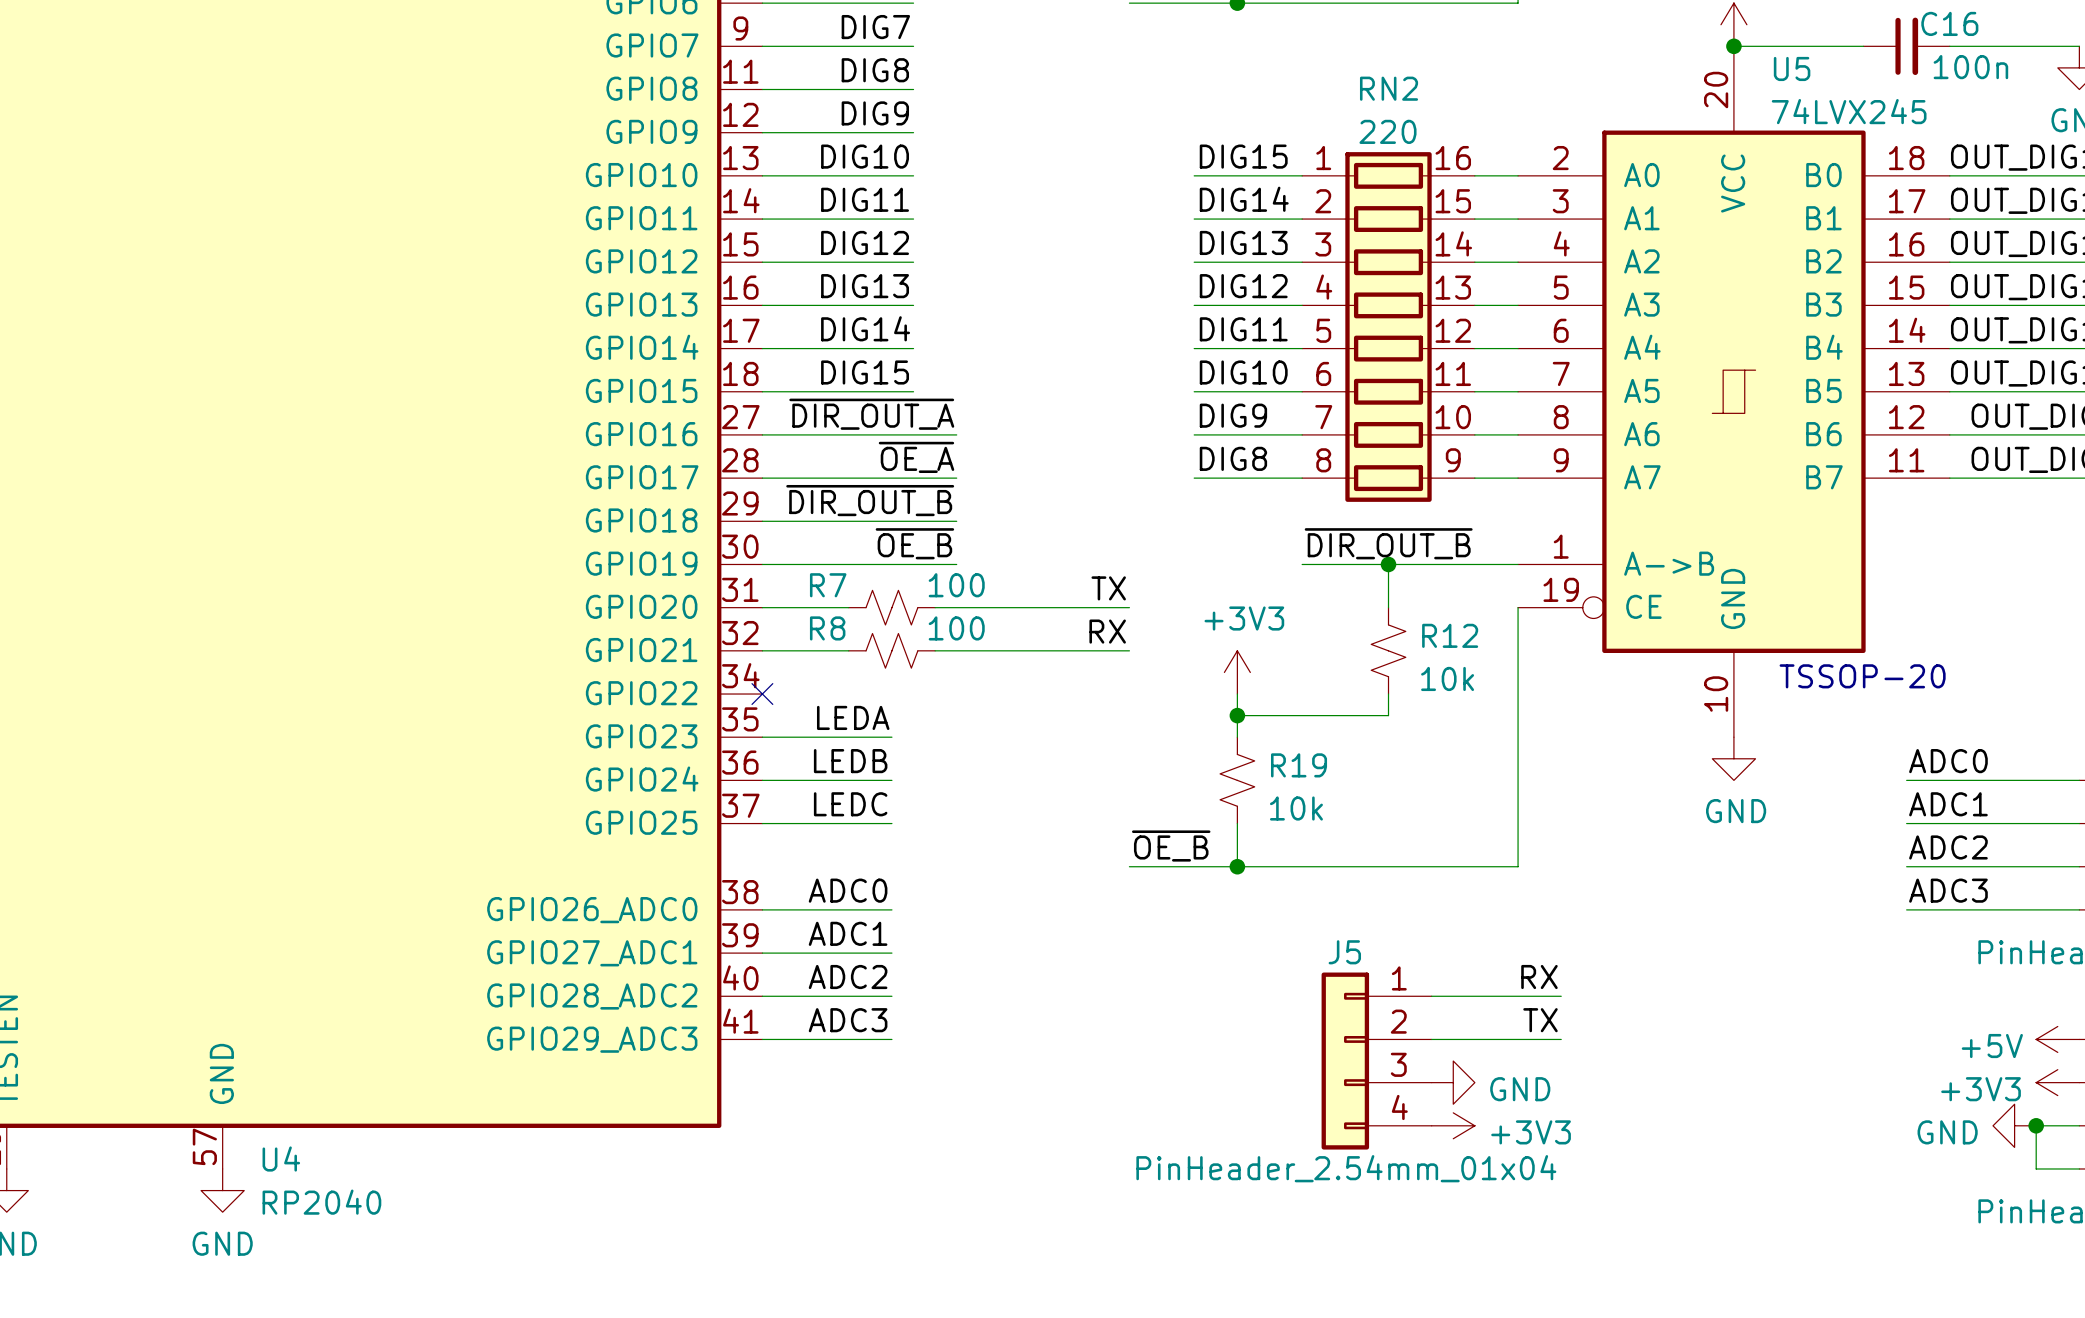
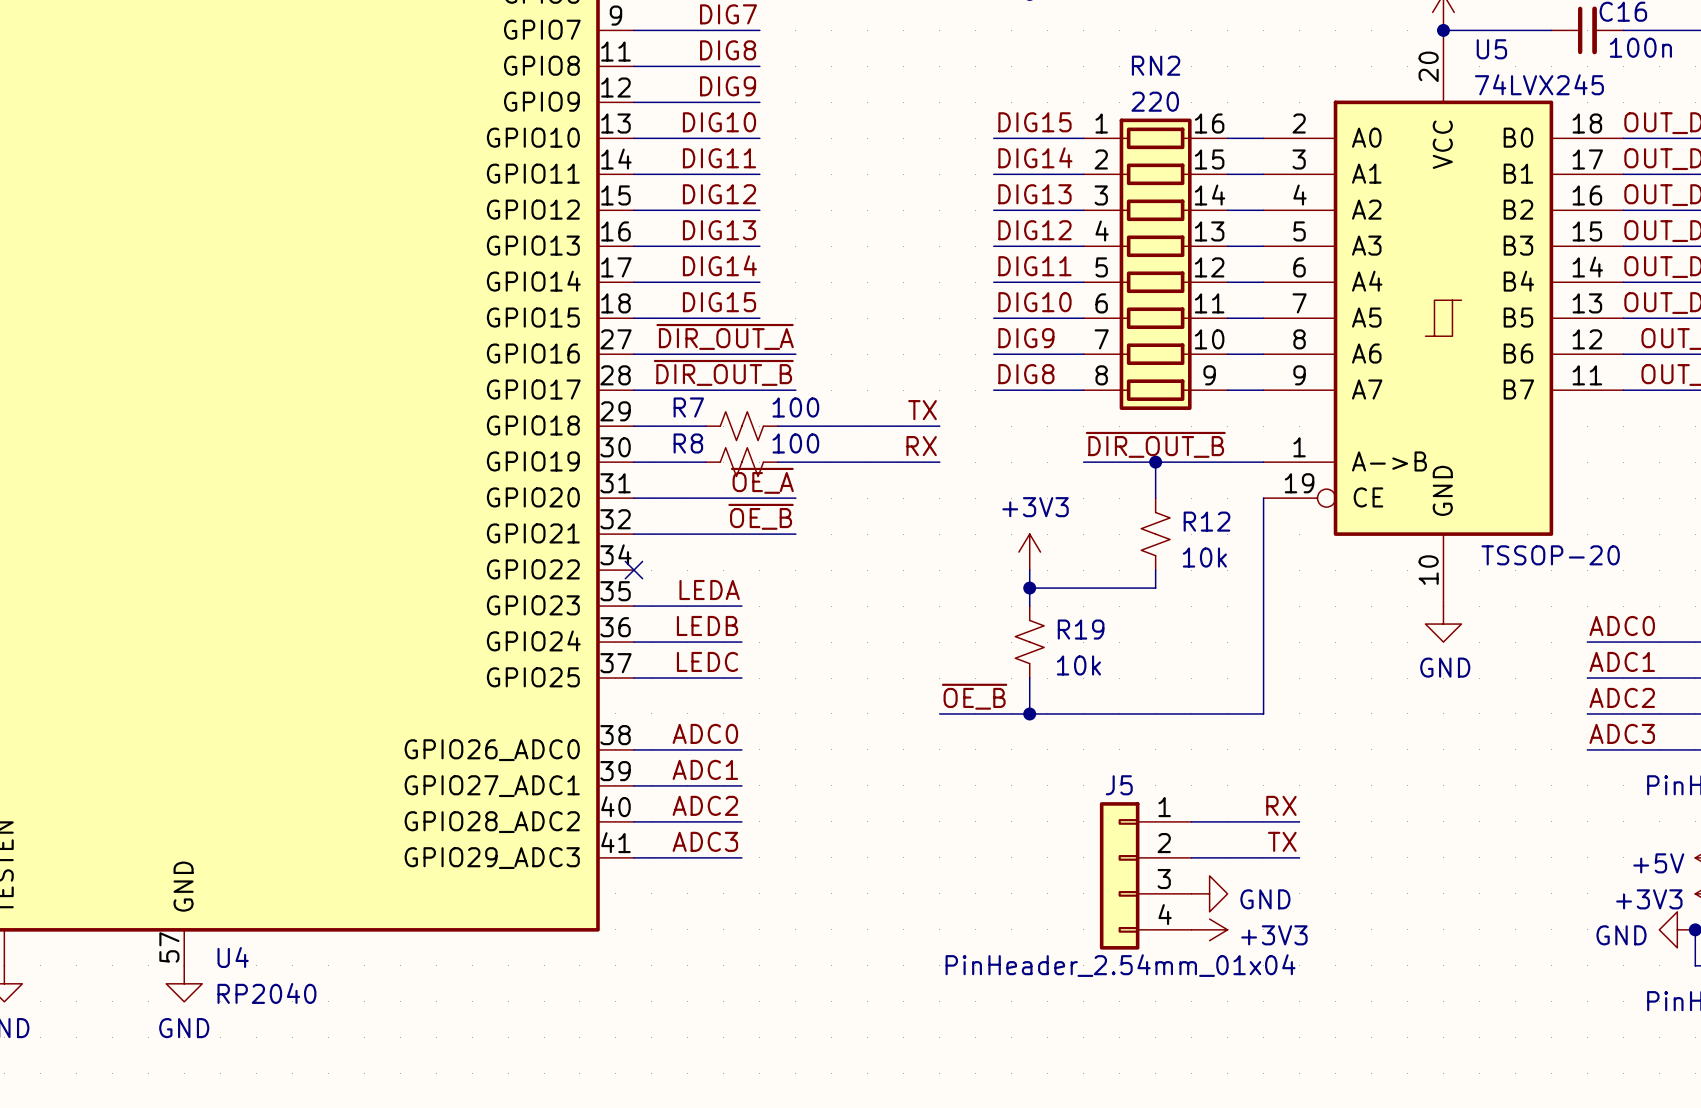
label: ~{OE_A} (916, 457) -> ~{DIR_OUT_B} (723, 372)
label: ~{DIR_OUT_B} (870, 500) -> none
wire: (848, 521) (935, 521) -> (705, 534) (777, 534)
label position: ~{OE_B} (914, 543) -> ~{OE_B} (761, 516)
wire: (848, 564) (935, 564) -> (705, 498) (777, 498)
label: none -> ~{OE_A} (762, 480)
label position: TX (1108, 588) -> TX (922, 410)
R7 position: (891, 607) -> (741, 426)
wire: (956, 607) (1129, 607) -> (795, 462) (939, 462)
label position: RX (1107, 631) -> RX (921, 446)
R8 position: (891, 650) -> (741, 462)
wire: (956, 650) (1129, 650) -> (795, 426) (939, 426)

